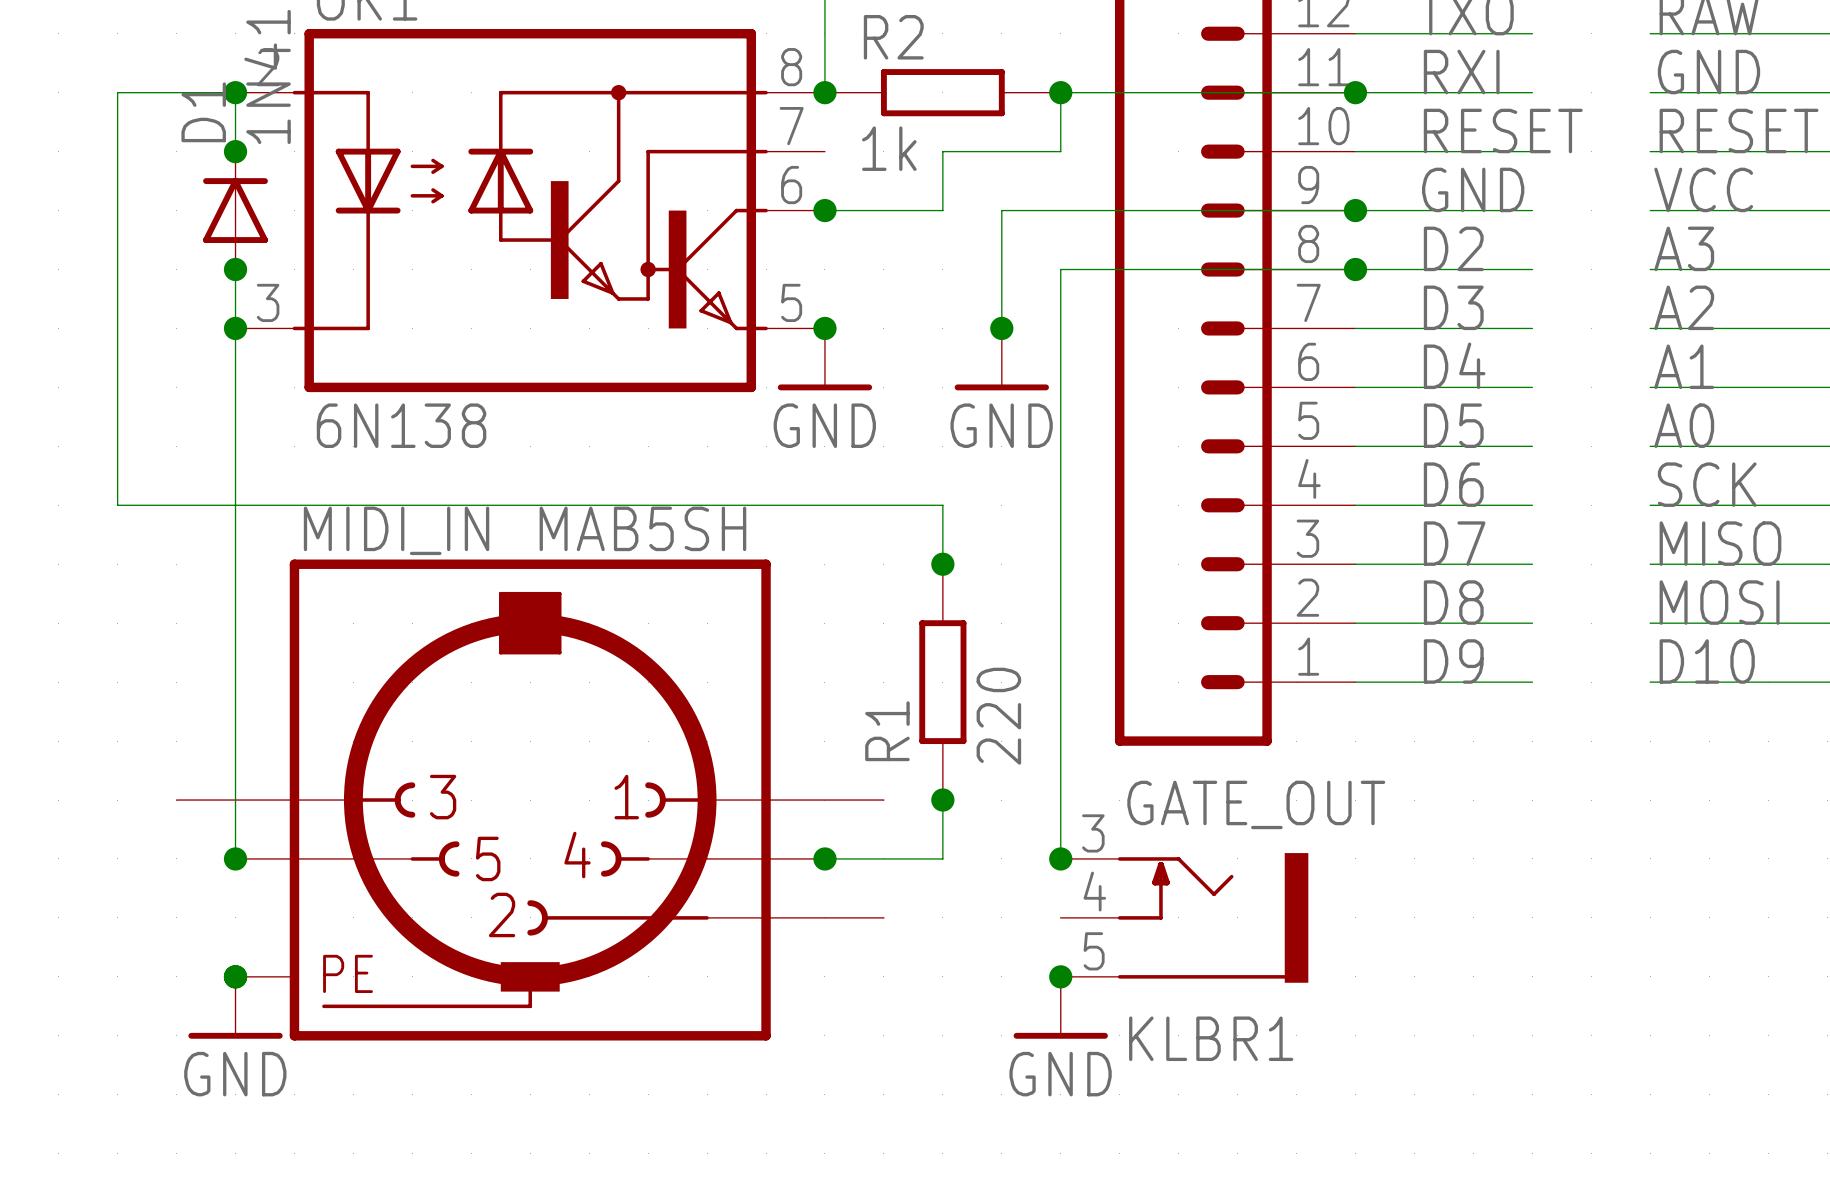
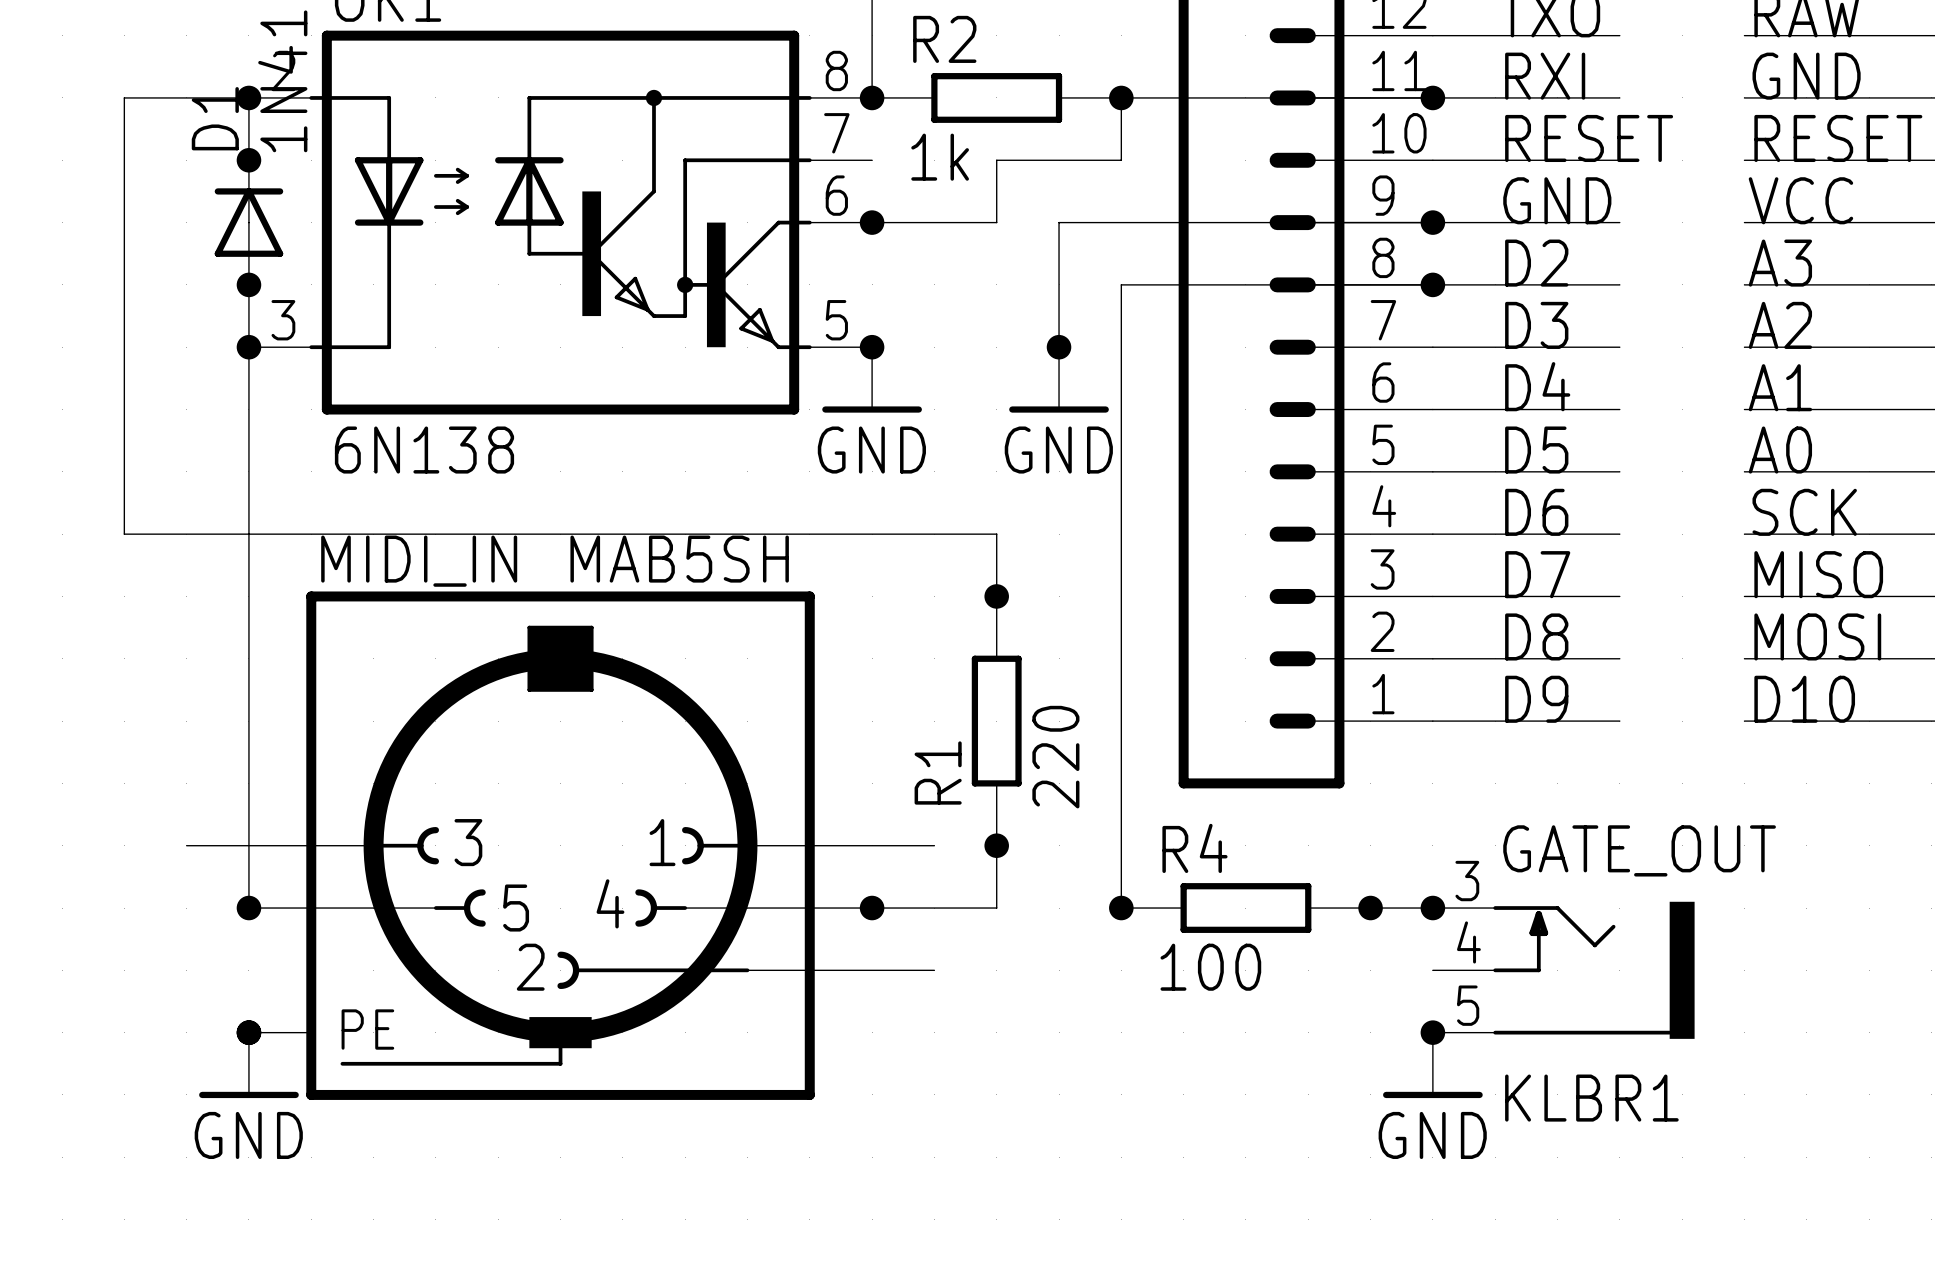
R4: none -> 100 (1245, 908)
wire: none -> (1370, 908) (1432, 908)
junction: none -> (1370, 908)
junction: none -> (1432, 908)
GATE_OUT position: (1184, 917) -> (1563, 970)
junction: (1060, 976) -> none
junction: none -> (1432, 1032)
power symbol position: GND (1060, 1007) -> GND (1432, 1065)

